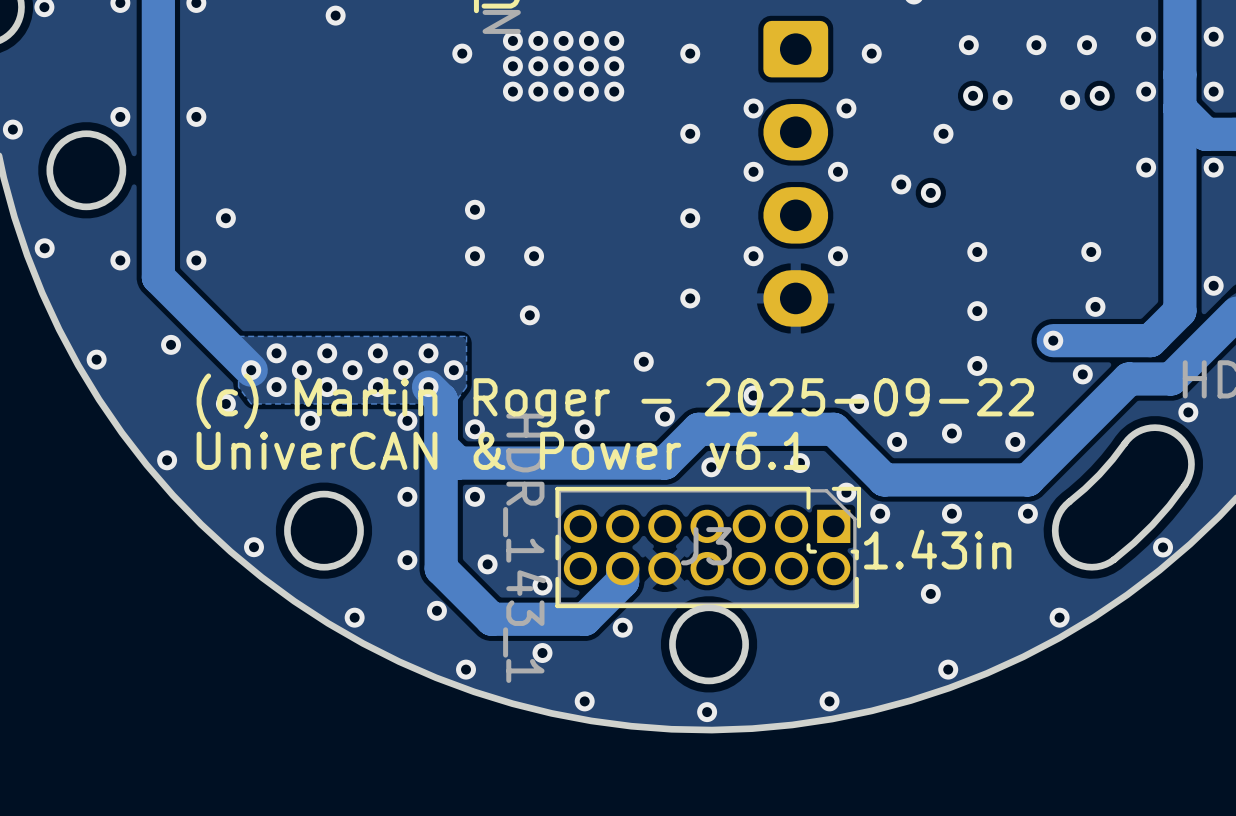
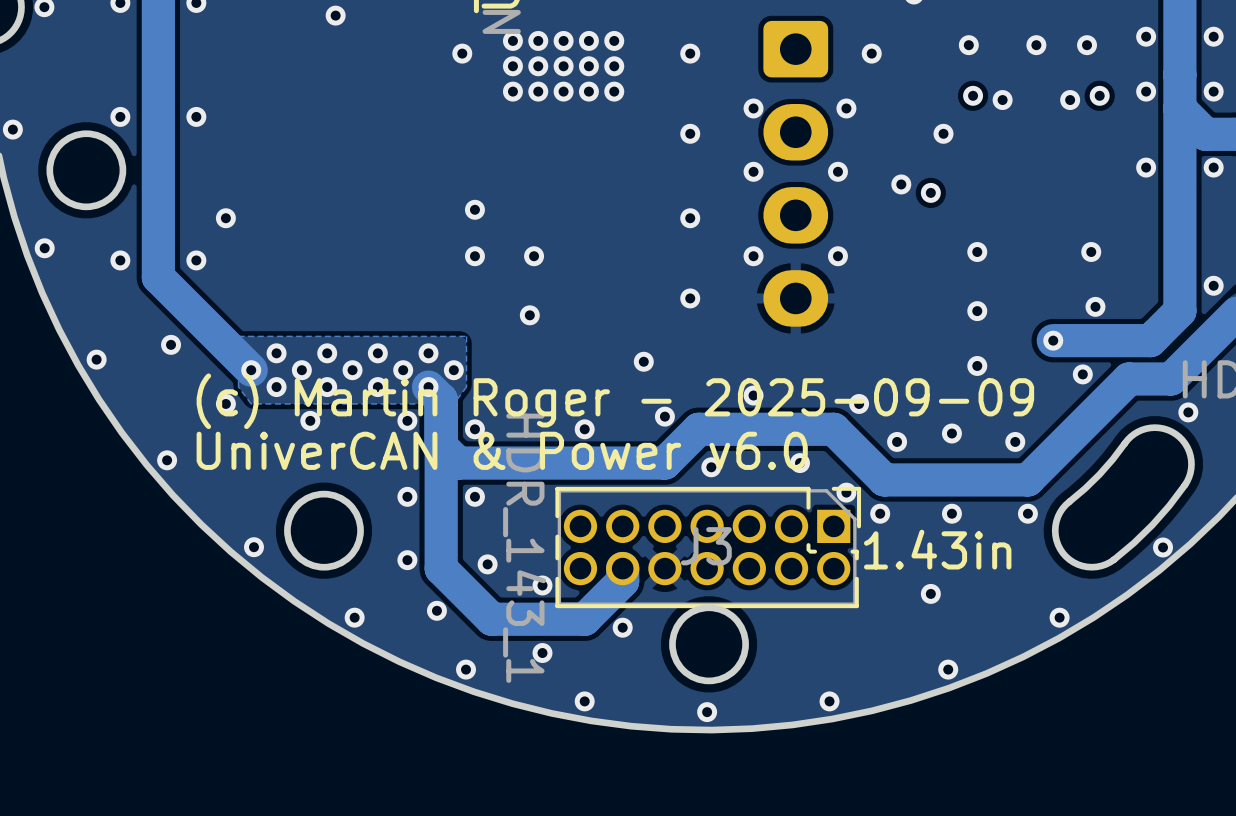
text: (c) Martin Roger - 2025-09-22 (615, 401) -> (c) Martin Roger - 2025-09-09 (615, 401)
text: UniverCAN & Power v6.1 (502, 450) -> UniverCAN & Power v6.0 (502, 450)

